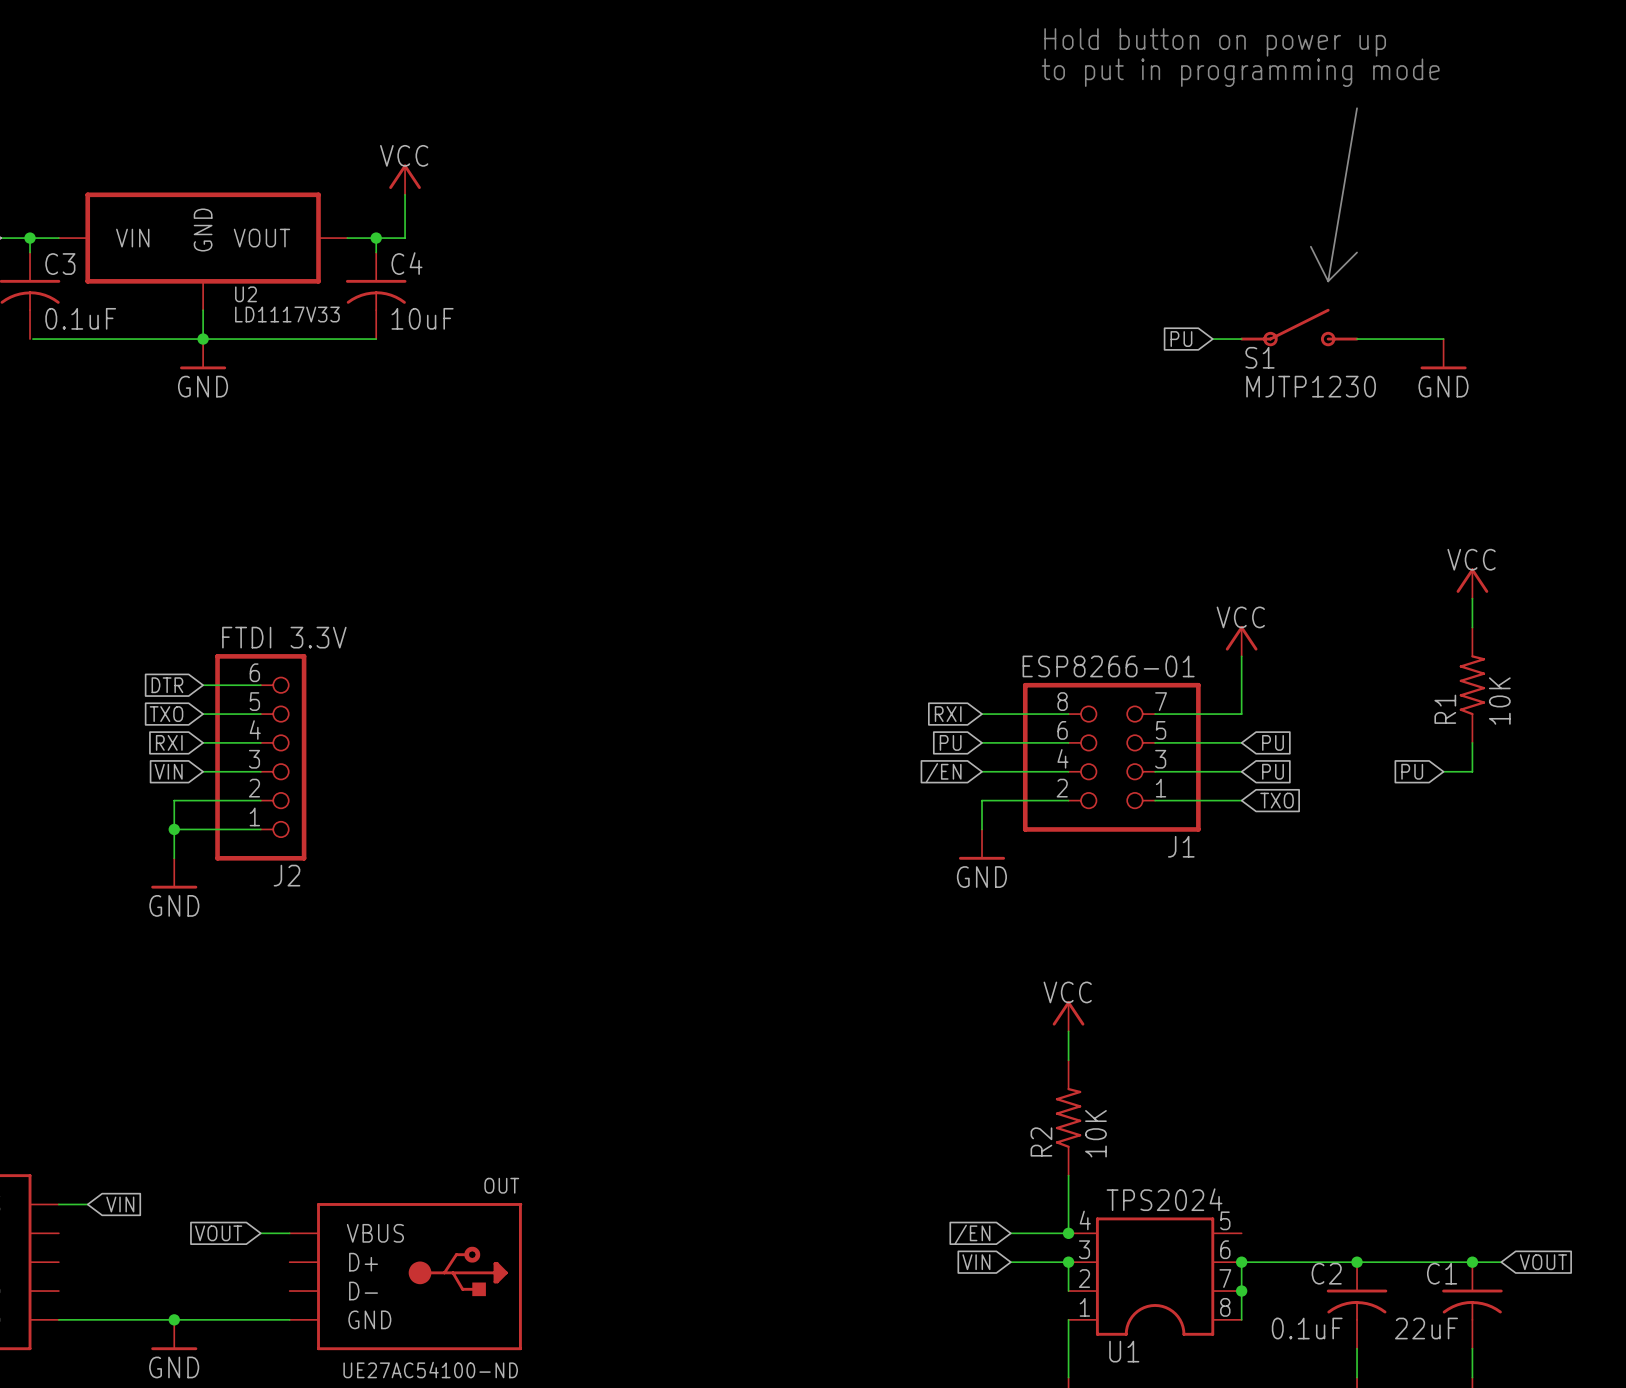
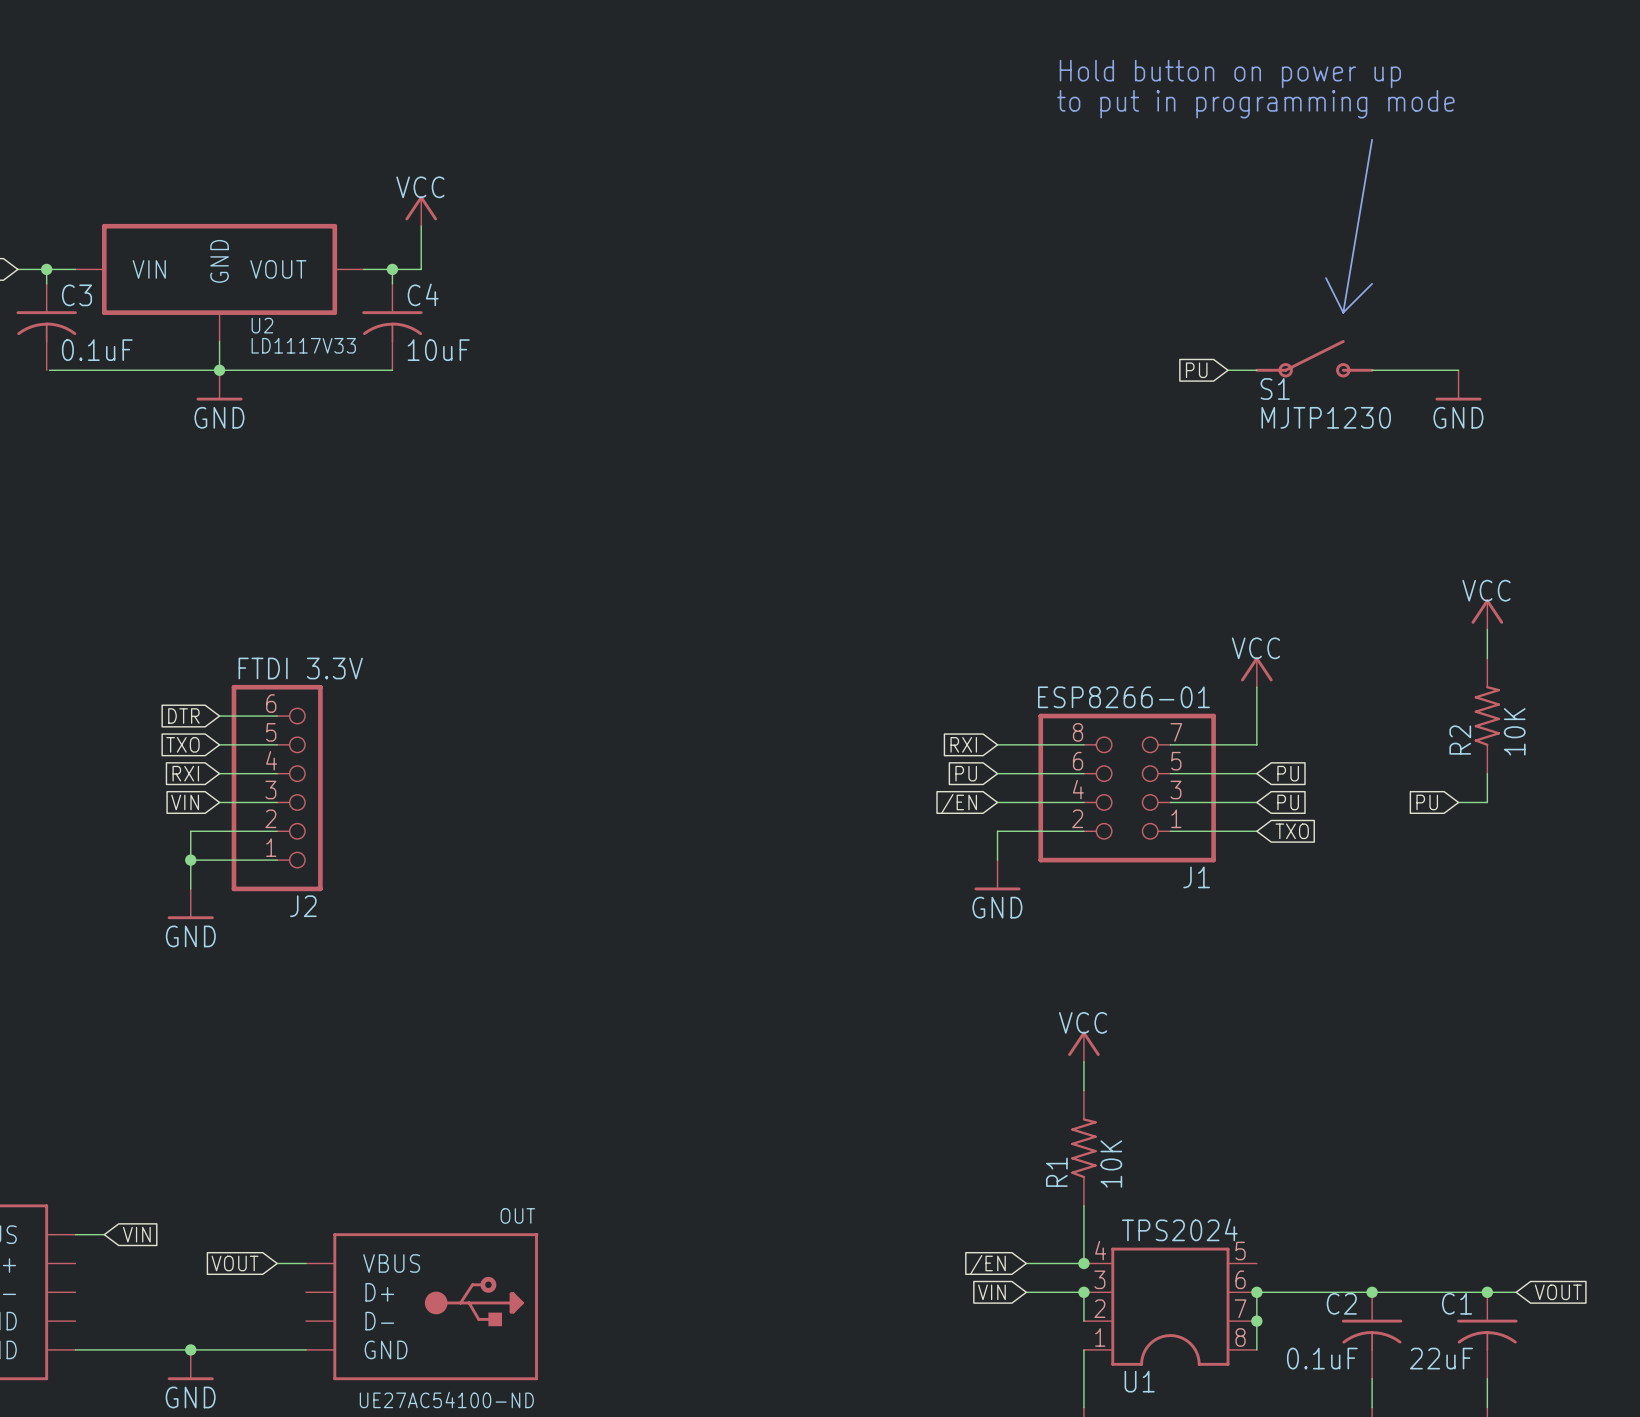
R1 name: R1 (1445, 709) -> R2 (1460, 740)
R2 name: R2 (1041, 1141) -> R1 (1056, 1172)

